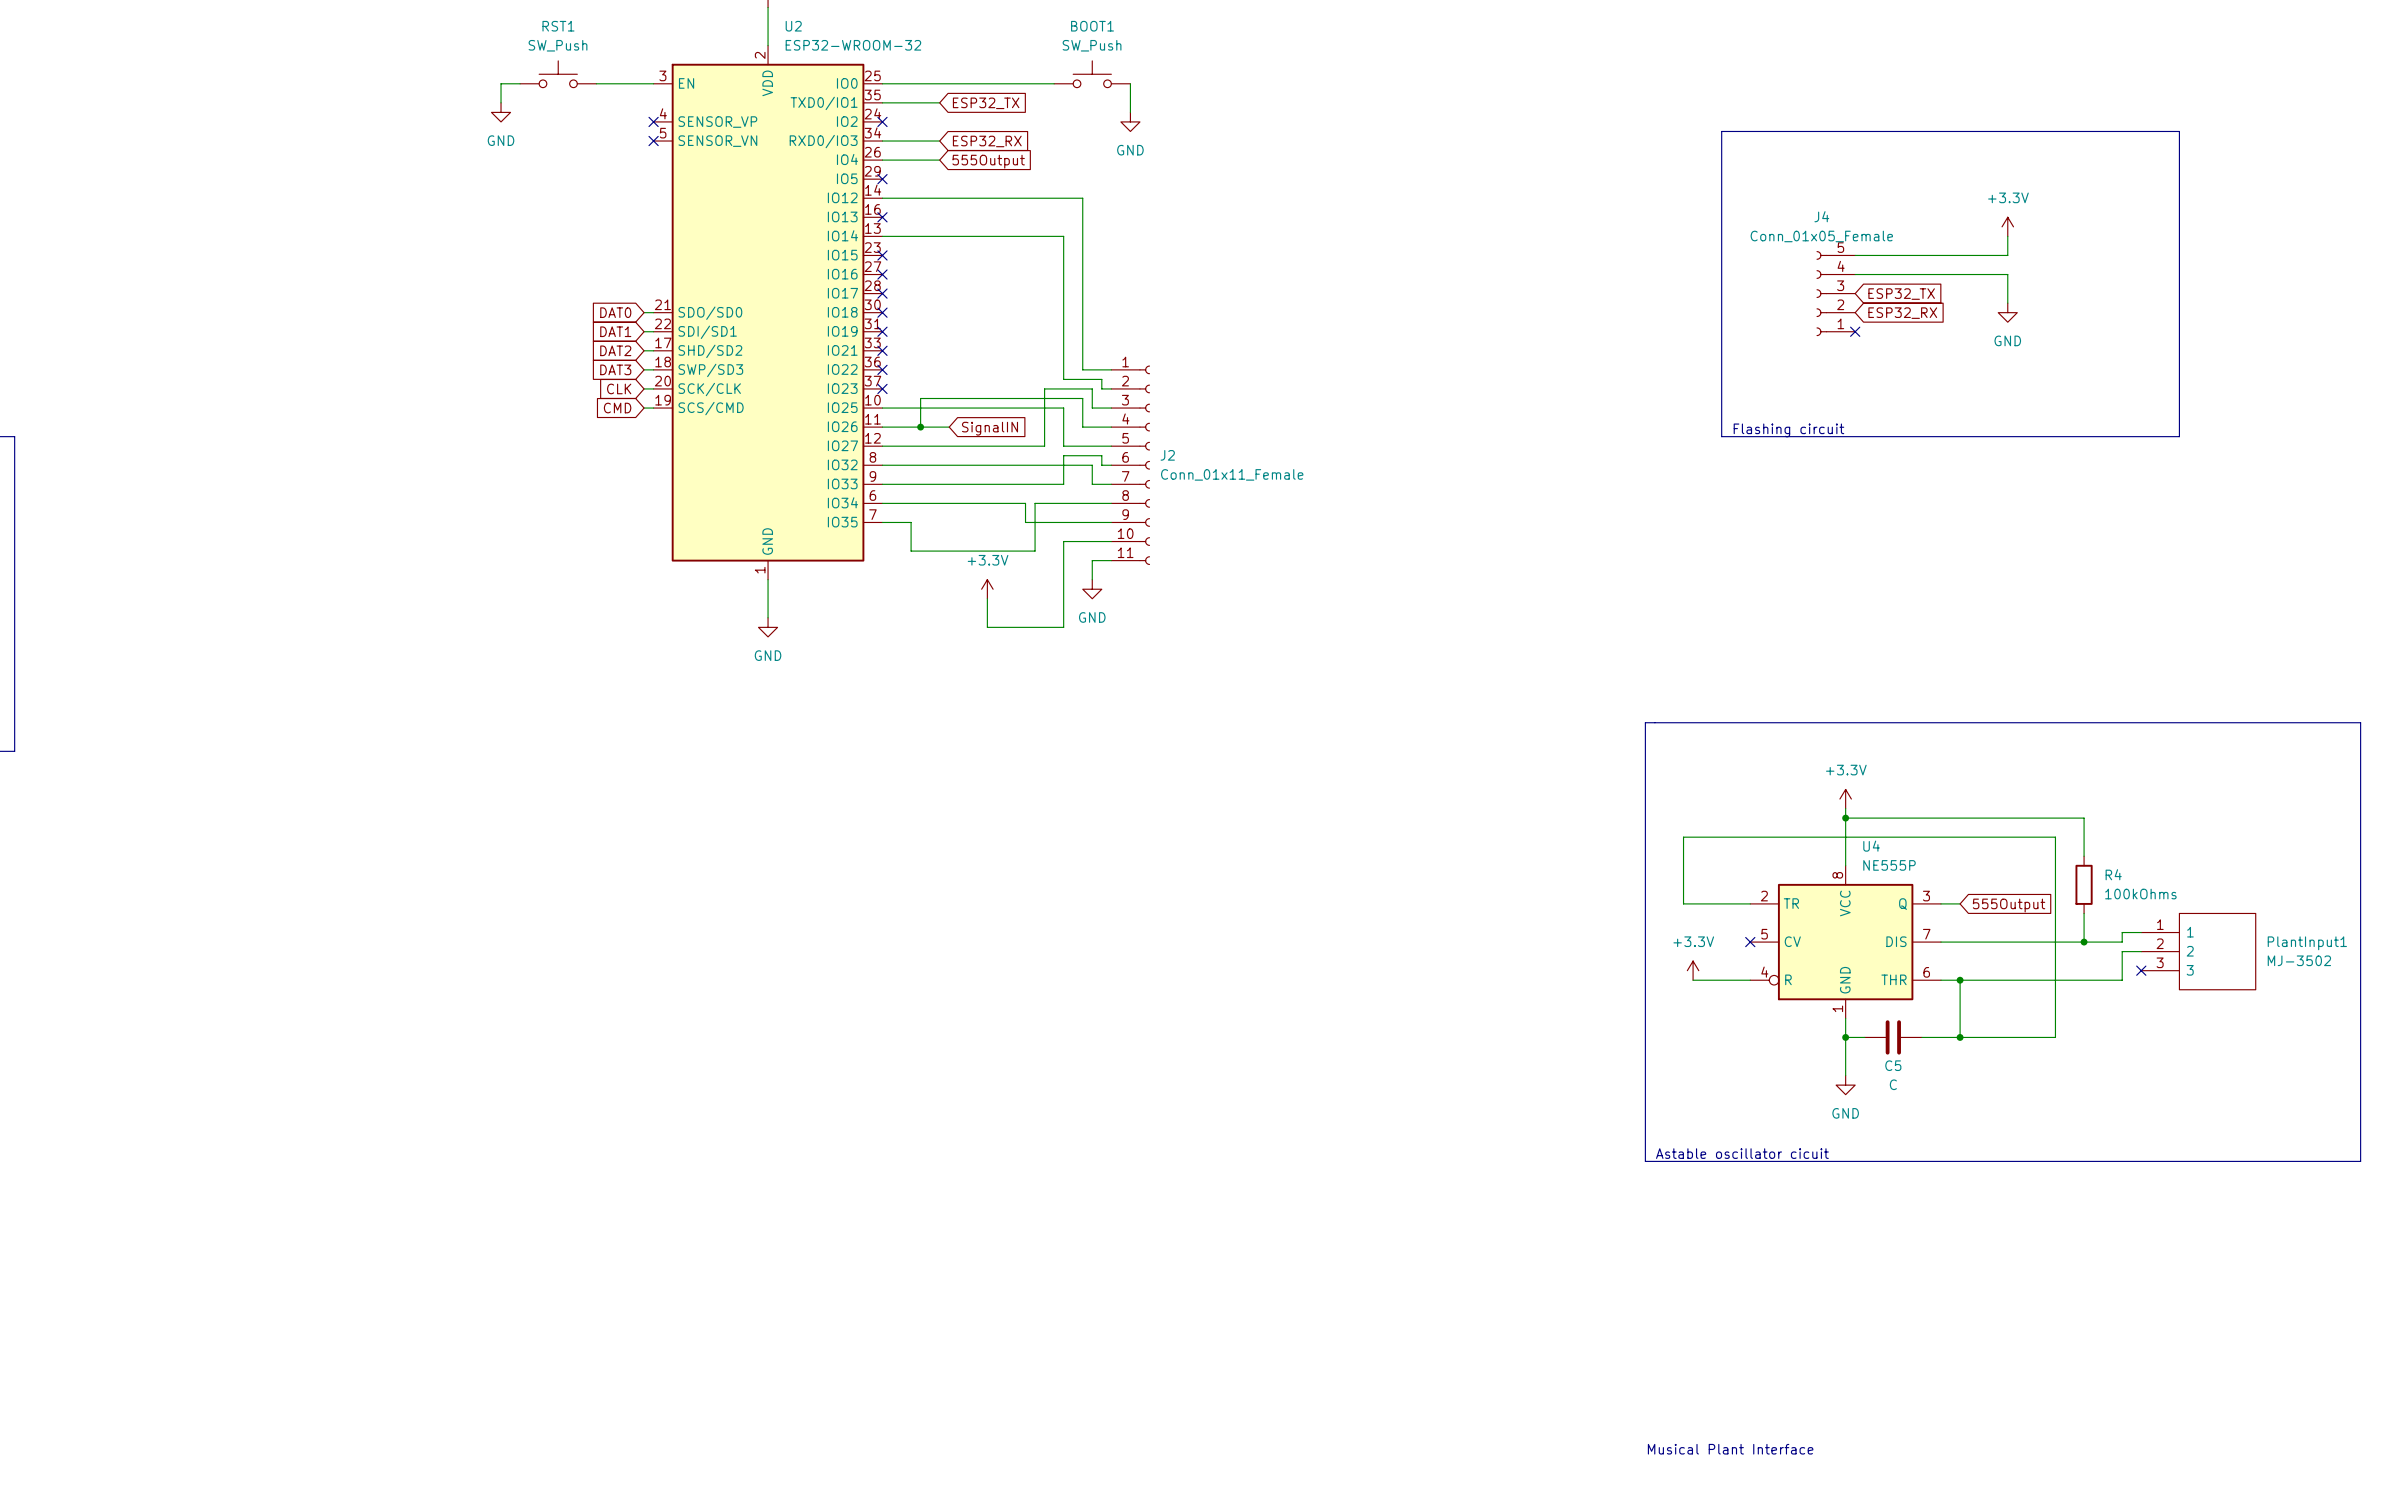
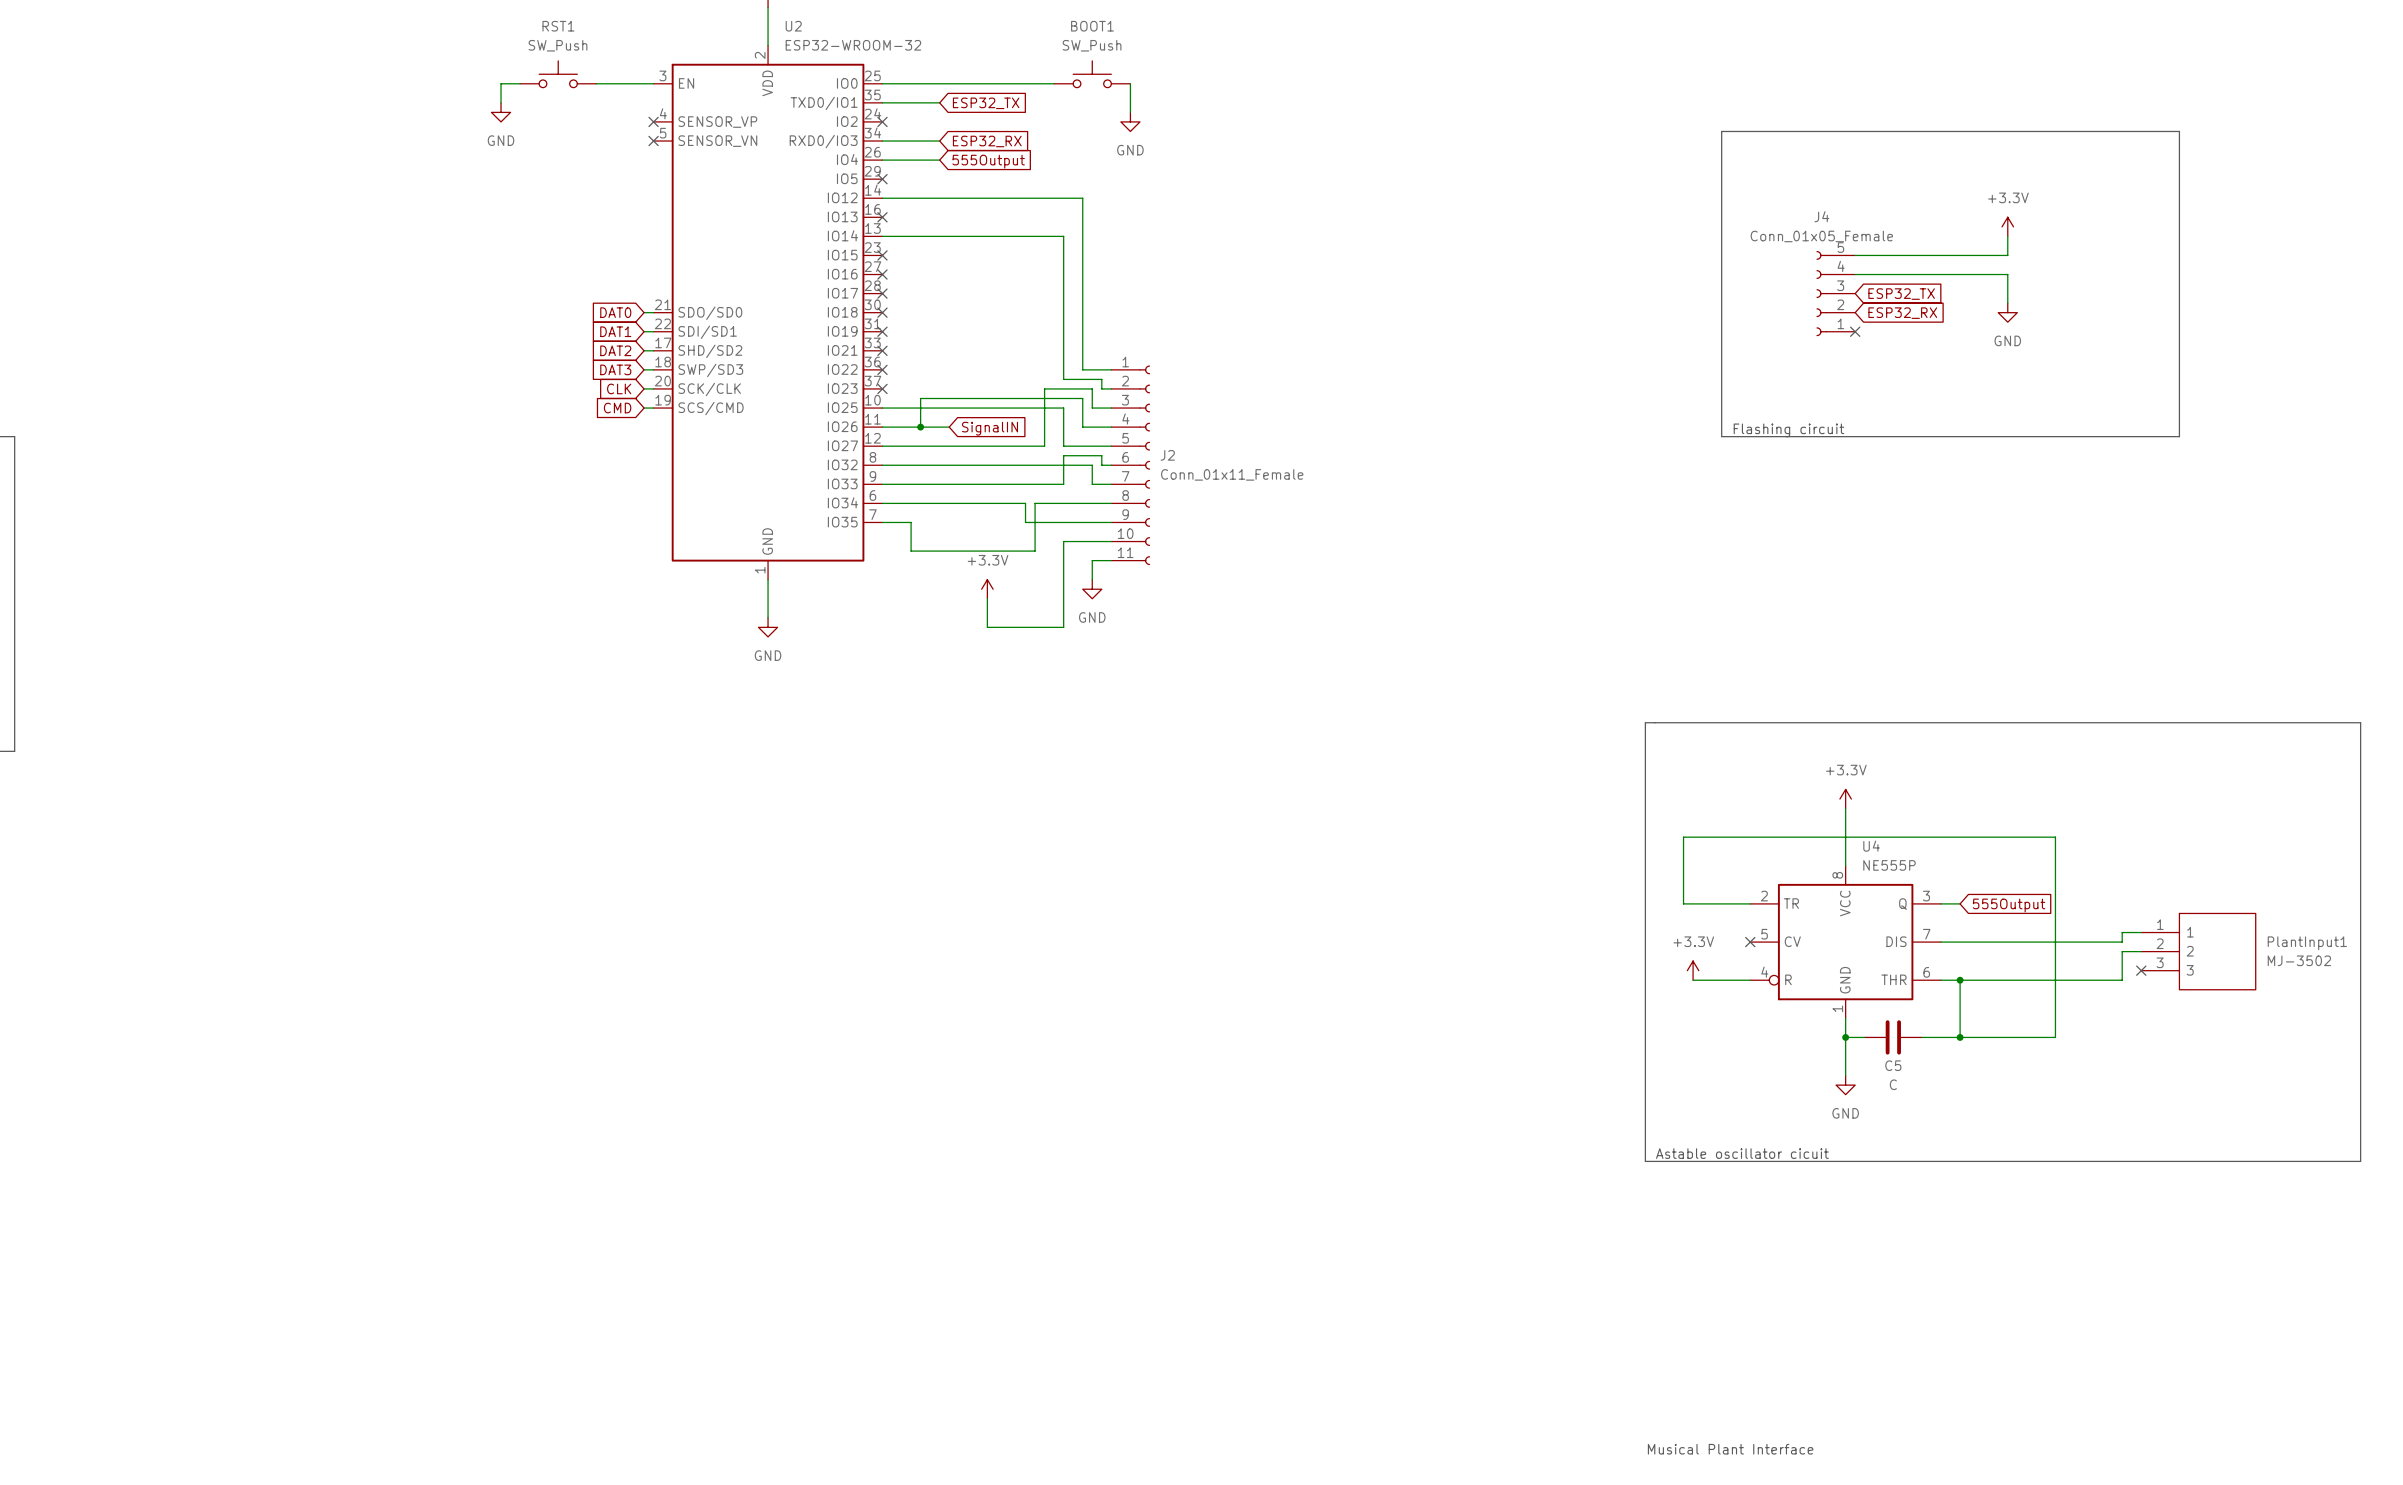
wire: (1845, 818) (2084, 818) (2084, 856) -> none
junction: (1845, 818) -> none
R4: 100kOhms (2084, 884) -> none
wire: (2084, 913) (2084, 942) -> none
junction: (2084, 942) -> none

